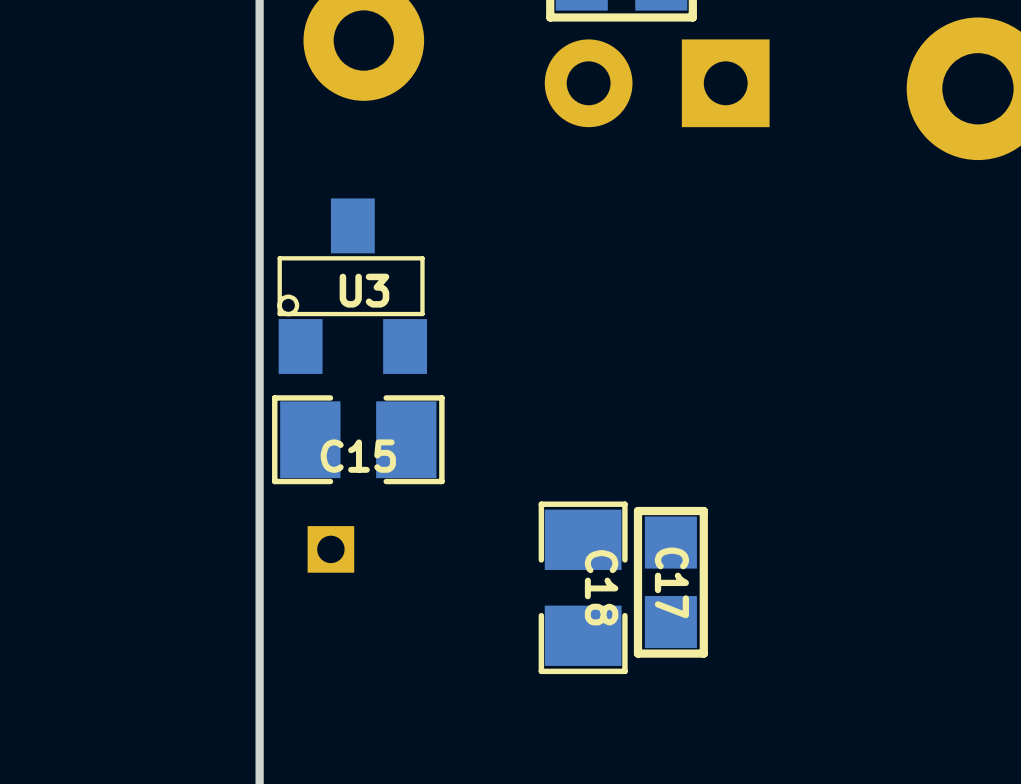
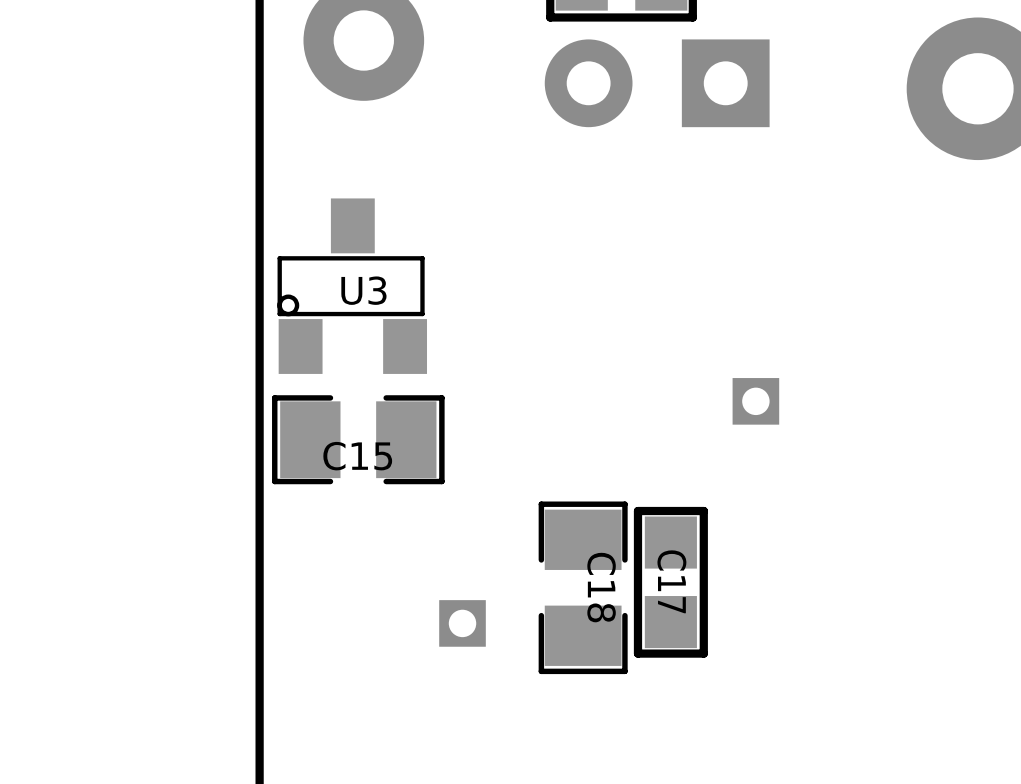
part: none -> (755, 401)
part position: (330, 549) -> (462, 623)

